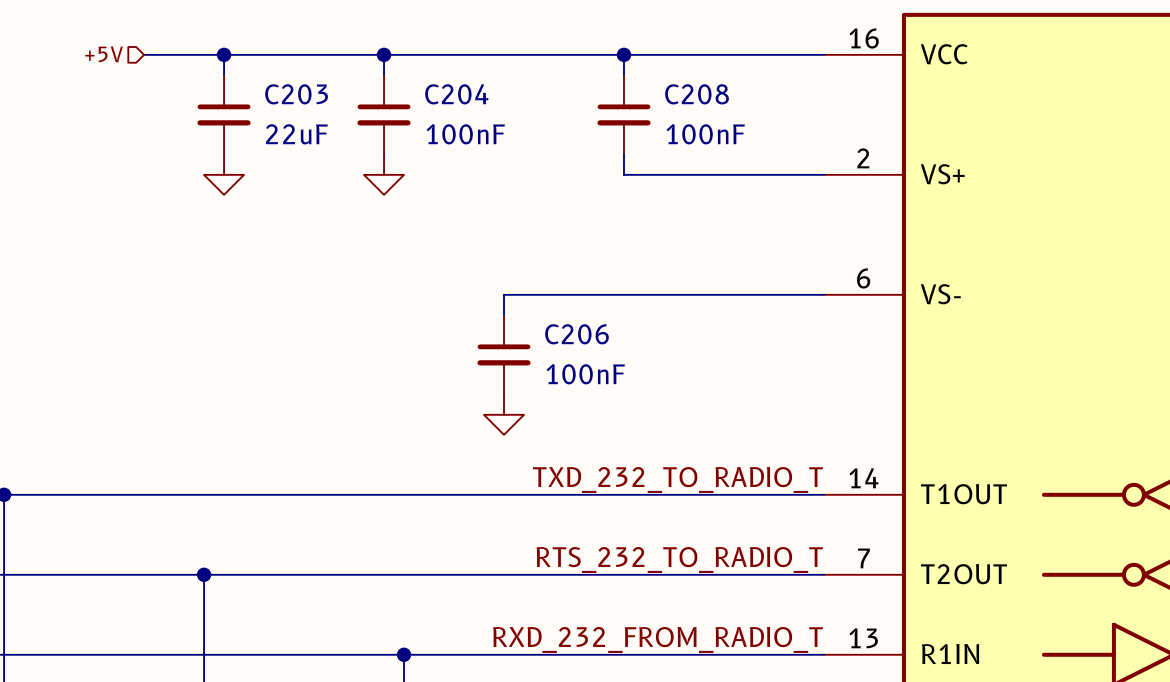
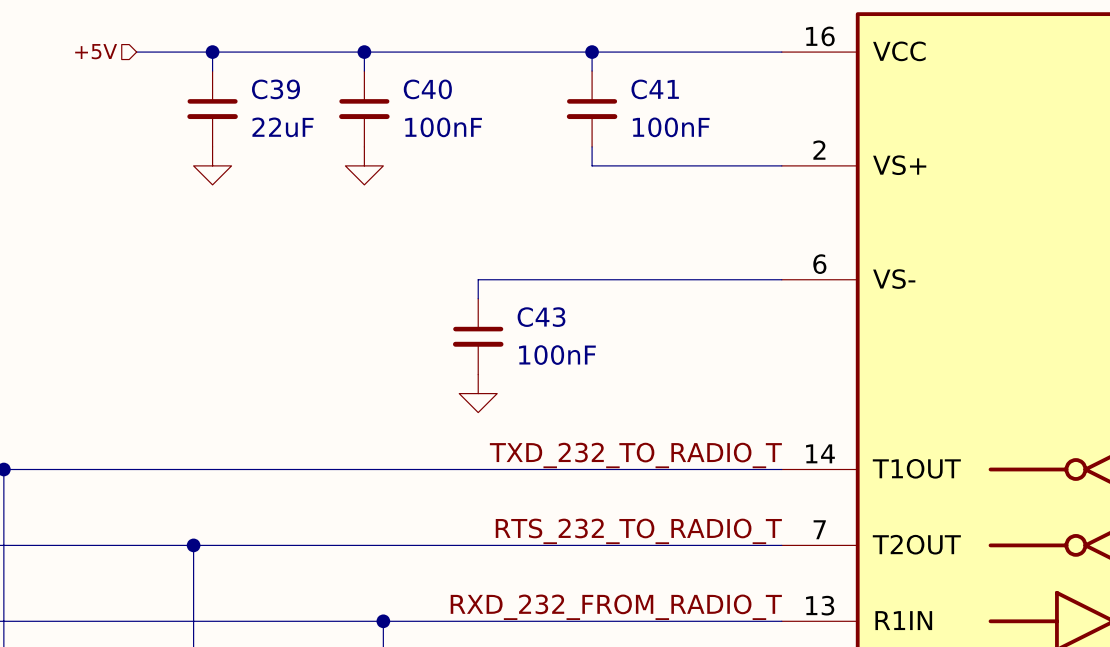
C203 name: C203 (296, 94) -> C39 (275, 89)
C204 name: C204 (456, 94) -> C40 (427, 89)
C208 name: C208 (697, 94) -> C41 (655, 89)
C206 name: C206 (576, 334) -> C43 (541, 317)

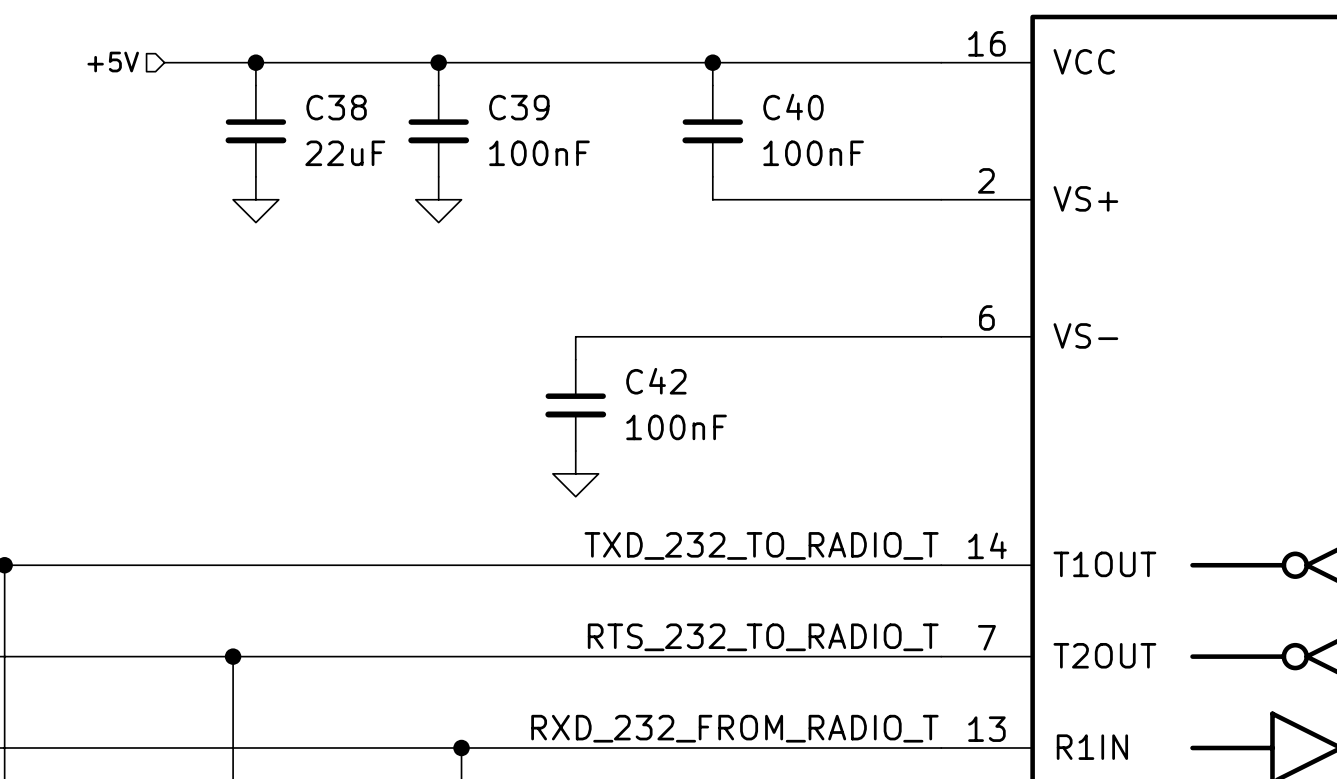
C39 name: C39 (275, 89) -> C38 (336, 107)
C40 name: C40 (427, 89) -> C39 (519, 107)
C41 name: C41 (655, 89) -> C40 (793, 107)
C43 name: C43 (541, 317) -> C42 (656, 381)

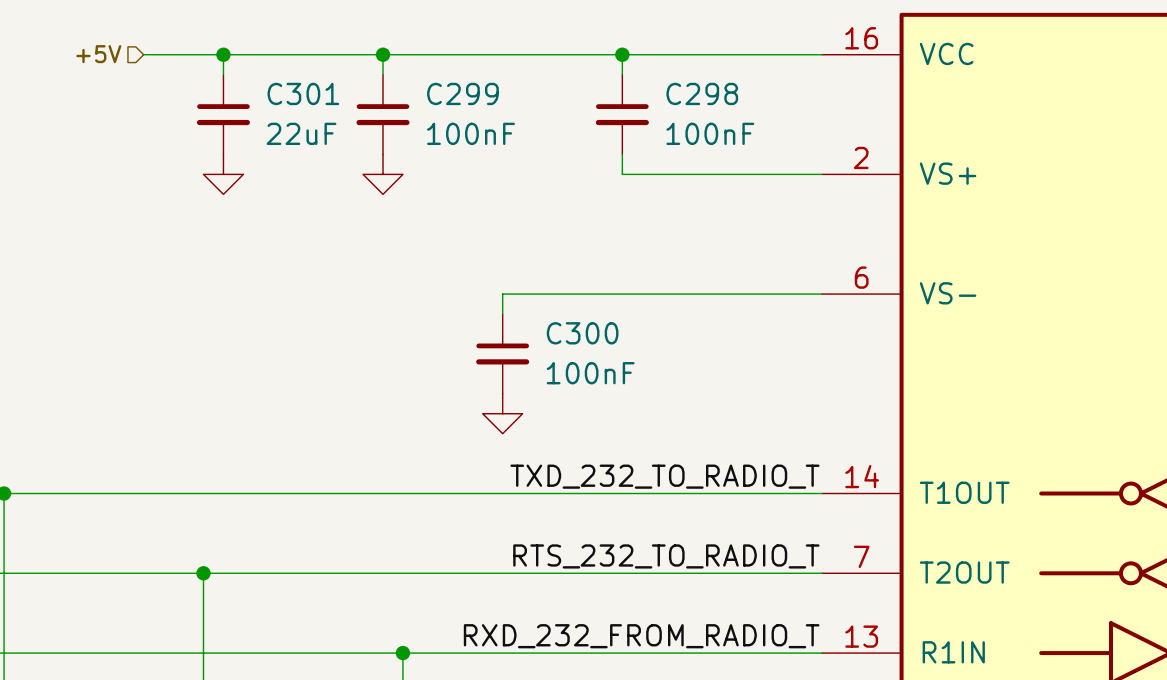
C38 name: C38 (336, 107) -> C301 (303, 93)
C39 name: C39 (519, 107) -> C299 (462, 93)
C40 name: C40 (793, 107) -> C298 (702, 93)
C42 name: C42 (656, 381) -> C300 (582, 333)

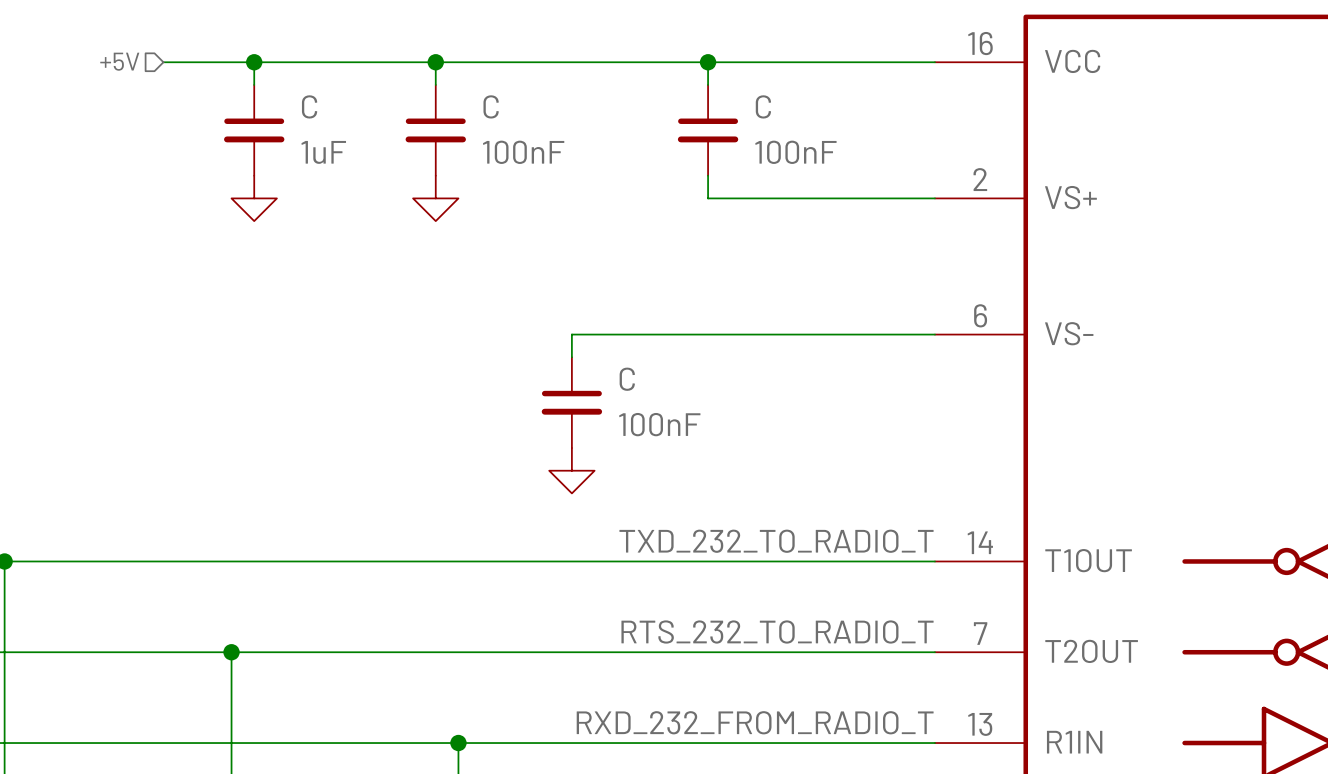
C301 name: C301 (303, 93) -> C (309, 106)
C299 name: C299 (462, 93) -> C (491, 106)
C298 name: C298 (702, 93) -> C (763, 106)
C301 value: 22uF (301, 133) -> 1uF (323, 152)
C300 name: C300 (582, 333) -> C (627, 379)

